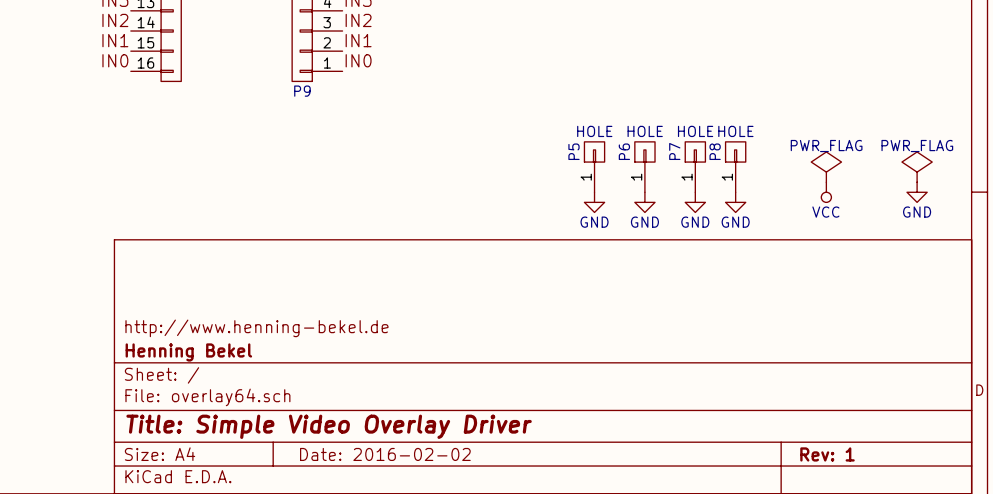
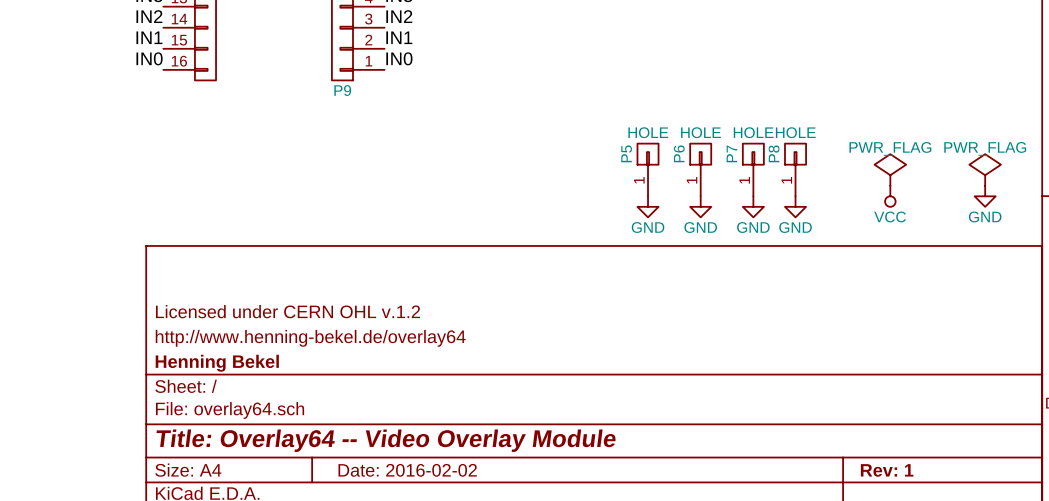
title block: none -> Licensed under CERN OHL v.1.2 (288, 311)
title block: http://www.henning-bekel.de (256, 328) -> http://www.henning-bekel.de/overlay64 (310, 338)
title block: Title: Simple Video Overlay Driver (329, 426) -> Title: Overlay64 -- Video Overlay Module (386, 440)

